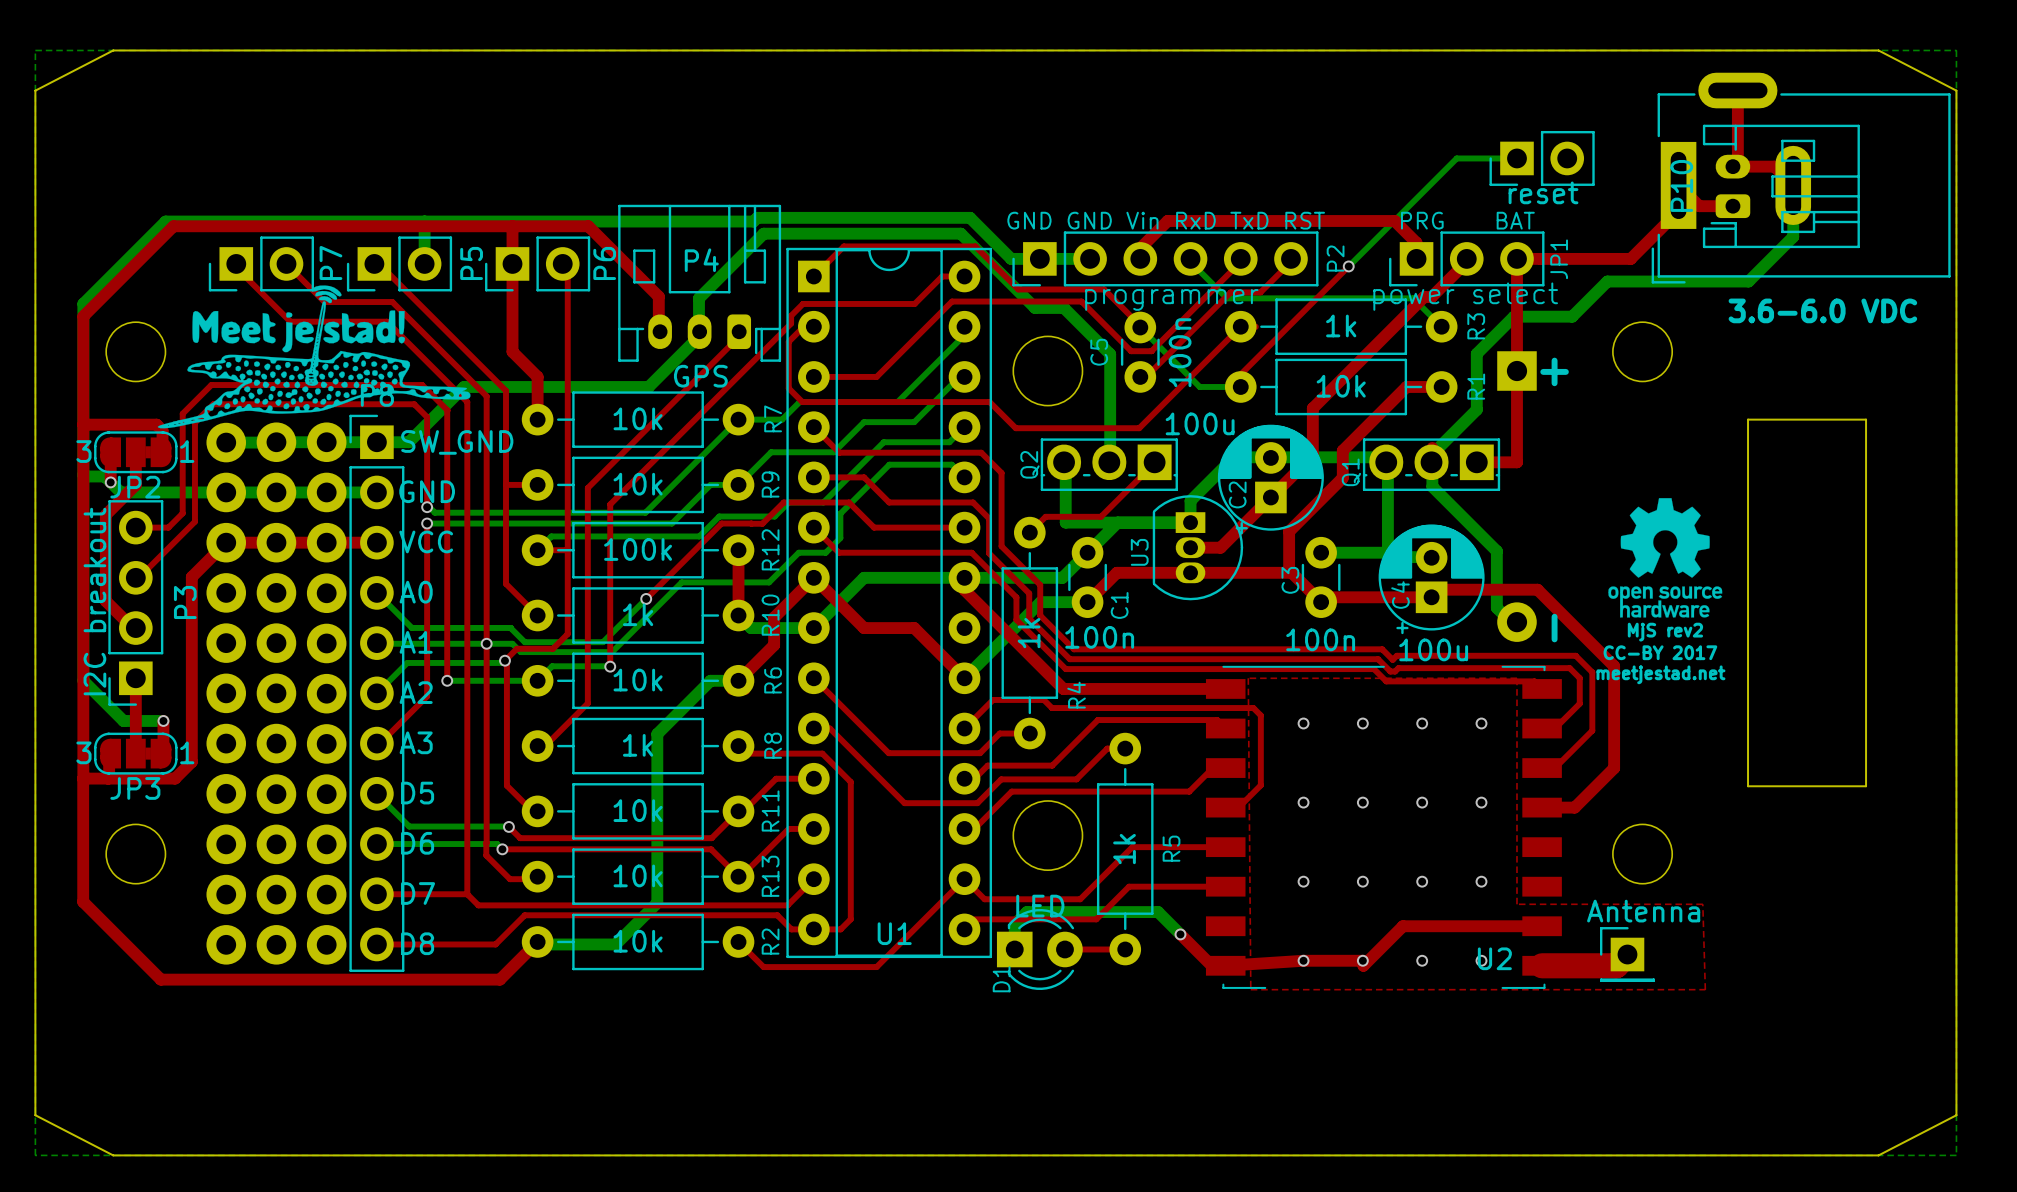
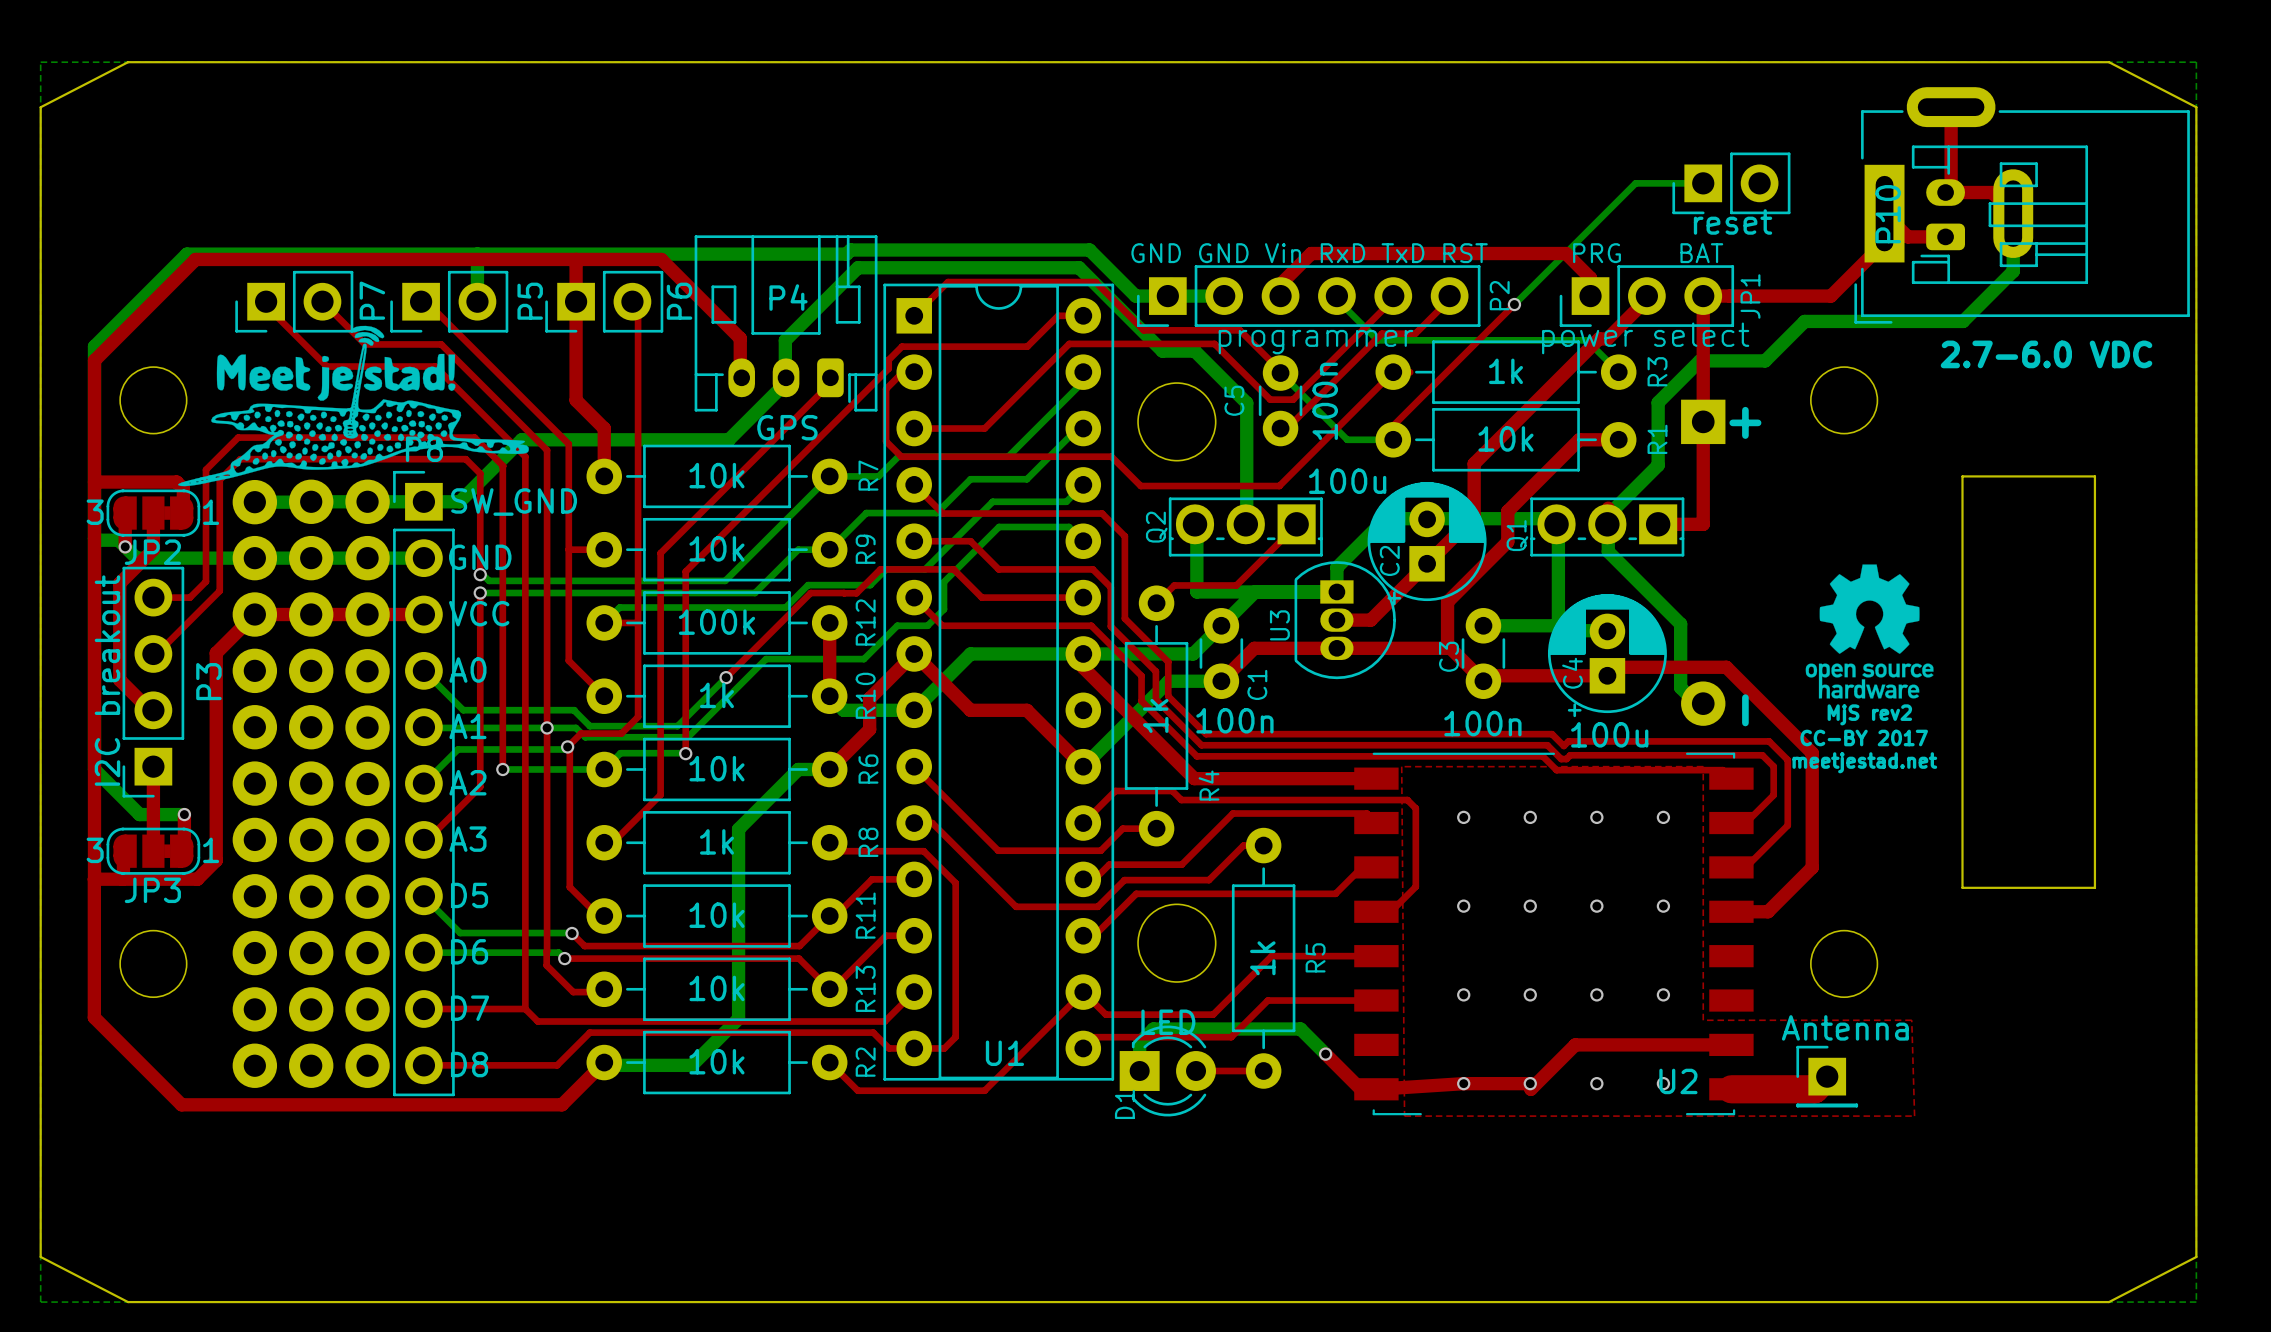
text: 3.6-6.0 VDC (1822, 310) -> 2.7-6.0 VDC (2046, 354)

